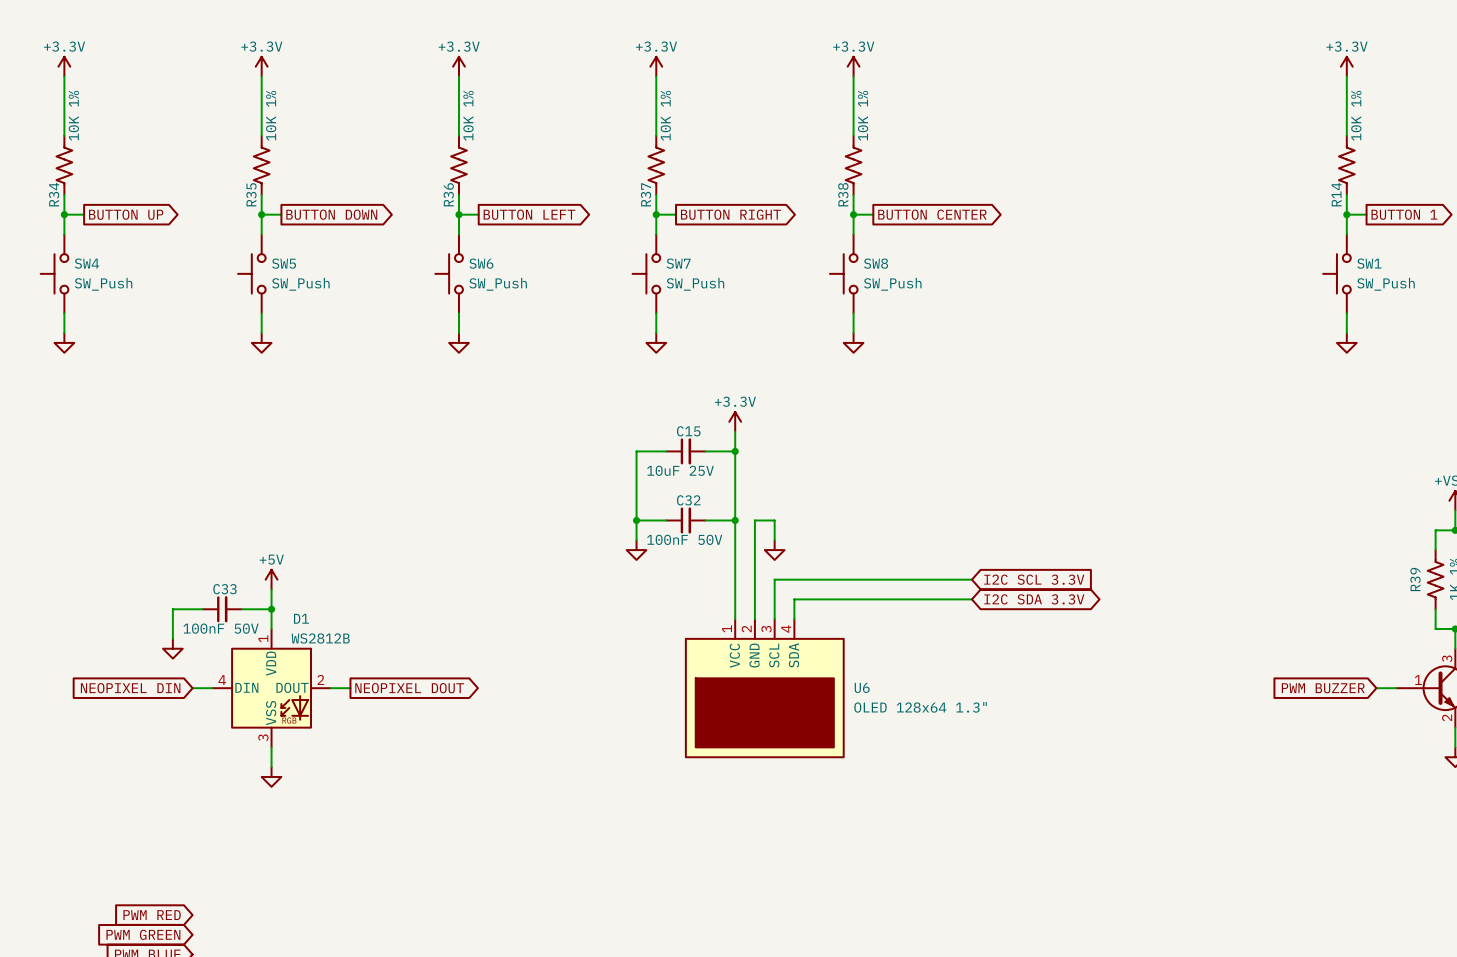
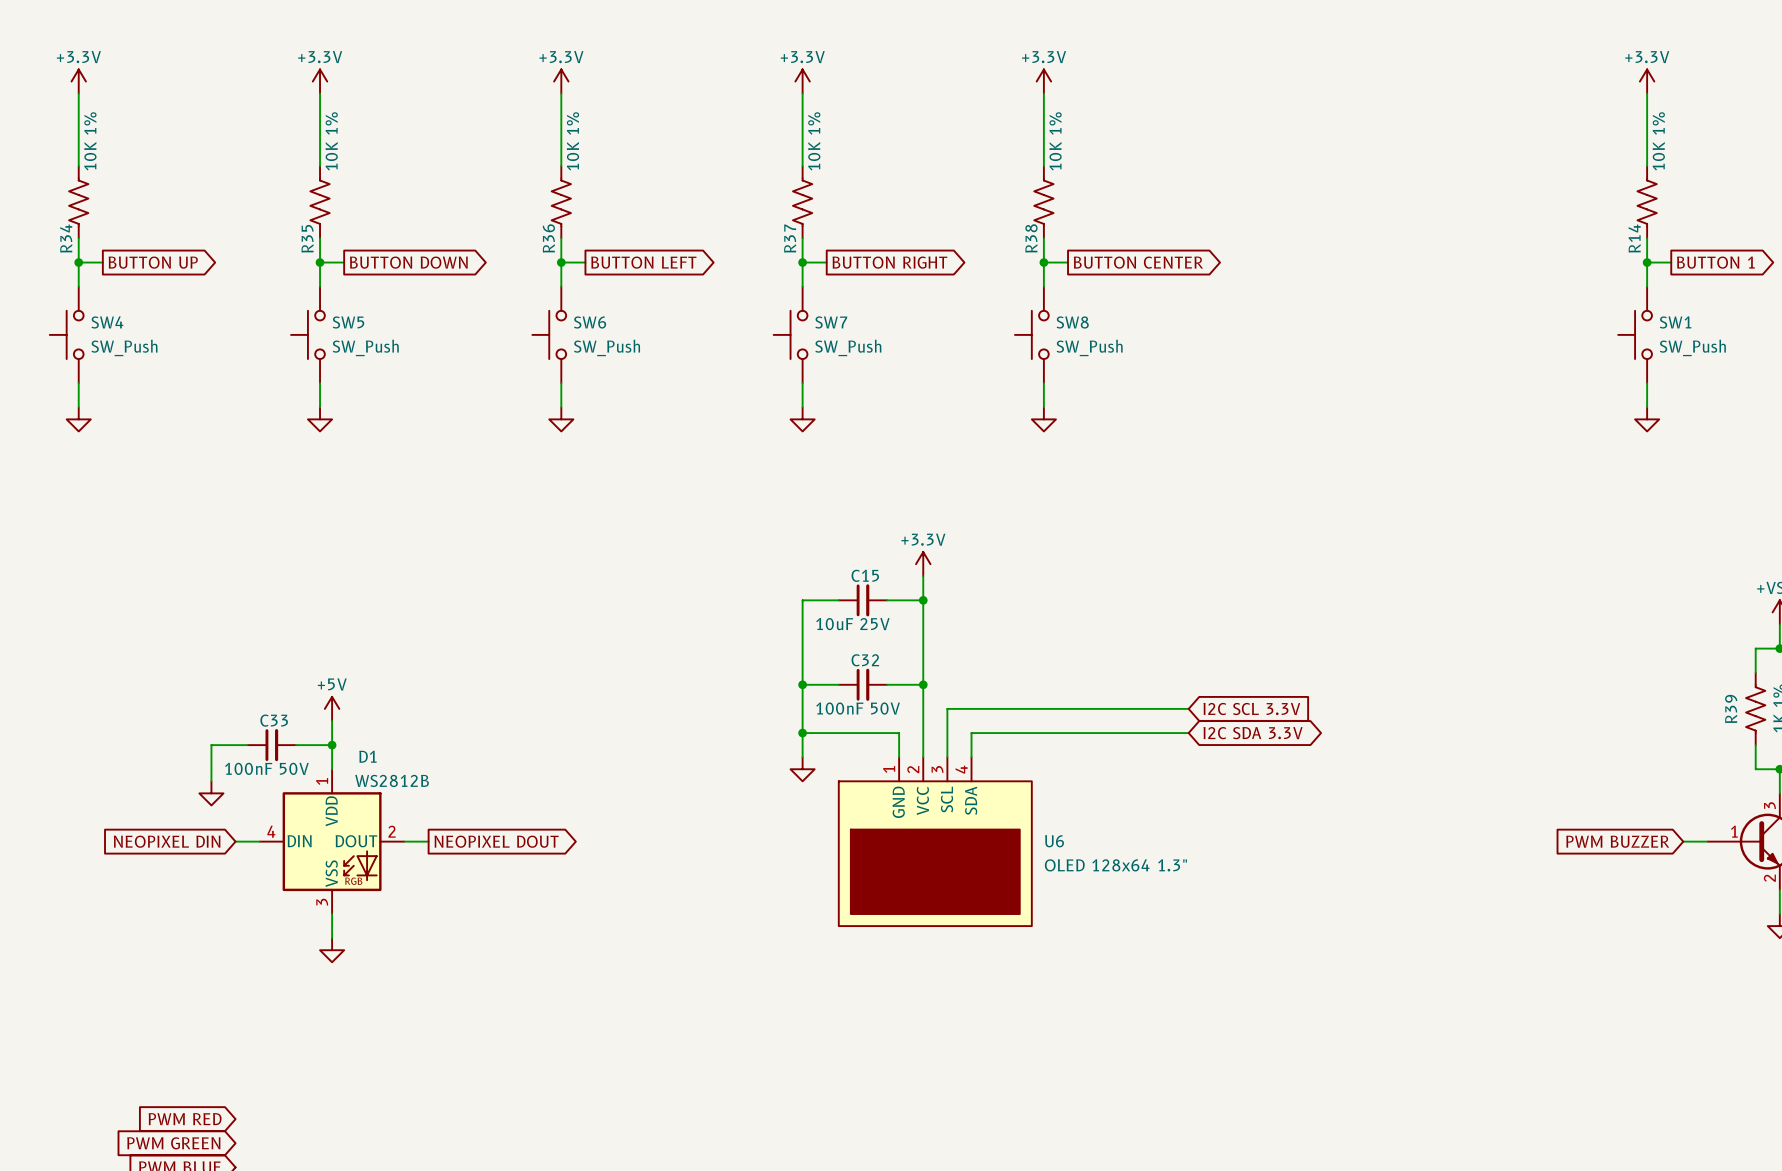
power symbol position: +3.3V (735, 421) -> +3.3V (923, 564)
wire: (735, 431) (735, 599) -> (802, 733) (899, 733)
wire: (666, 451) (636, 451) (636, 540) -> none
C15 position: (685, 451) -> (862, 600)
wire: (705, 451) (735, 451) -> (887, 600) (923, 600)
junction: (735, 451) -> none
wire: none -> (838, 600) (802, 600) (802, 757)
junction: none -> (923, 600)
wire: (636, 520) (666, 520) -> (802, 684) (838, 684)
junction: (636, 520) -> none
C32 position: (685, 520) -> (862, 684)
wire: (705, 520) (735, 520) -> (887, 684) (923, 684)
junction: (735, 520) -> none
wire: (754, 520) (774, 520) (774, 540) -> (923, 636) (923, 576)
power symbol: (636, 550) -> none
power symbol: (774, 550) -> none
junction: none -> (802, 684)
junction: none -> (923, 684)
junction: none -> (802, 733)
power symbol: none -> (802, 769)
U6 pin name: VCC (734, 655) -> GND (898, 802)
U6 pin name: GND (754, 655) -> VCC (922, 800)

